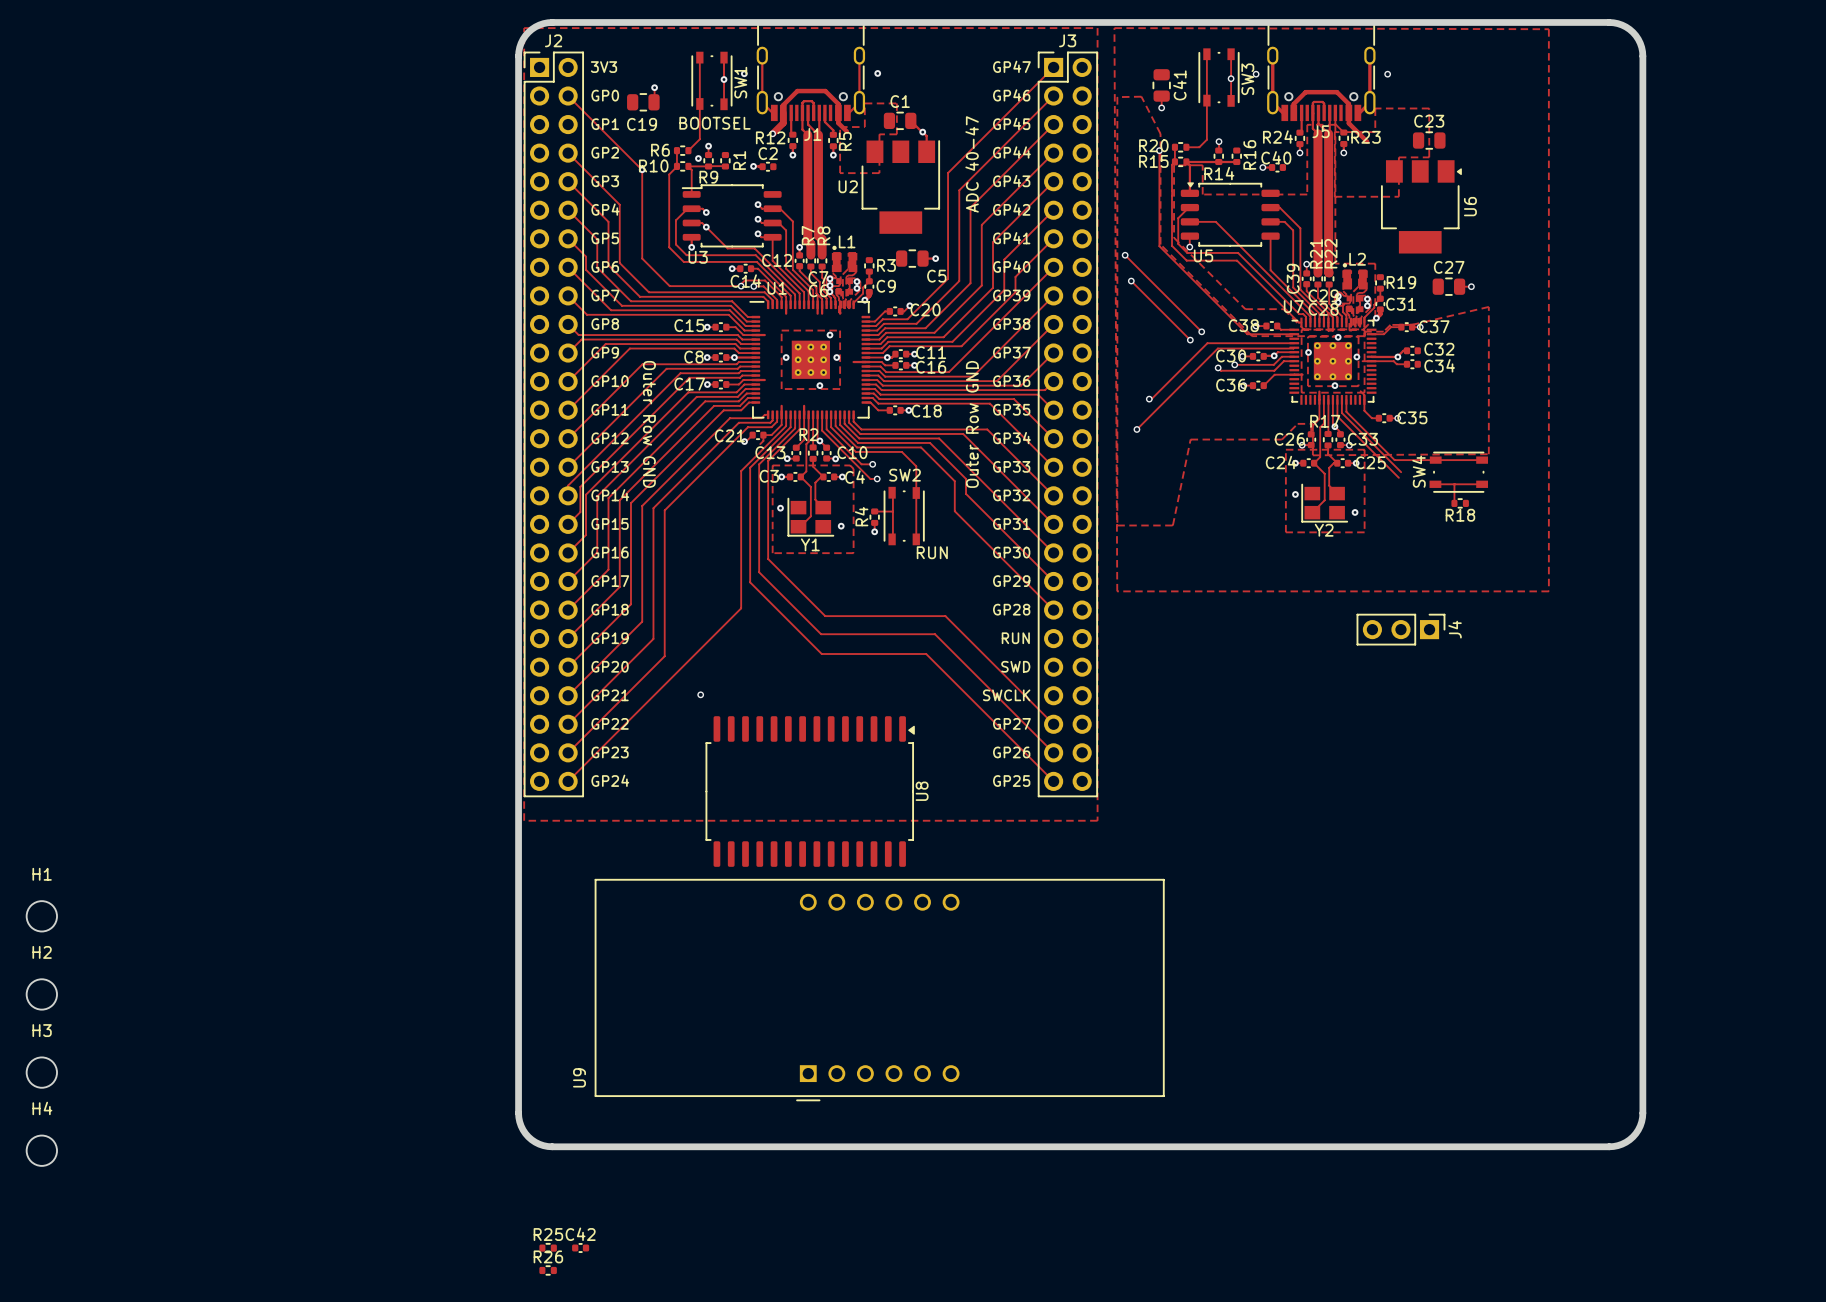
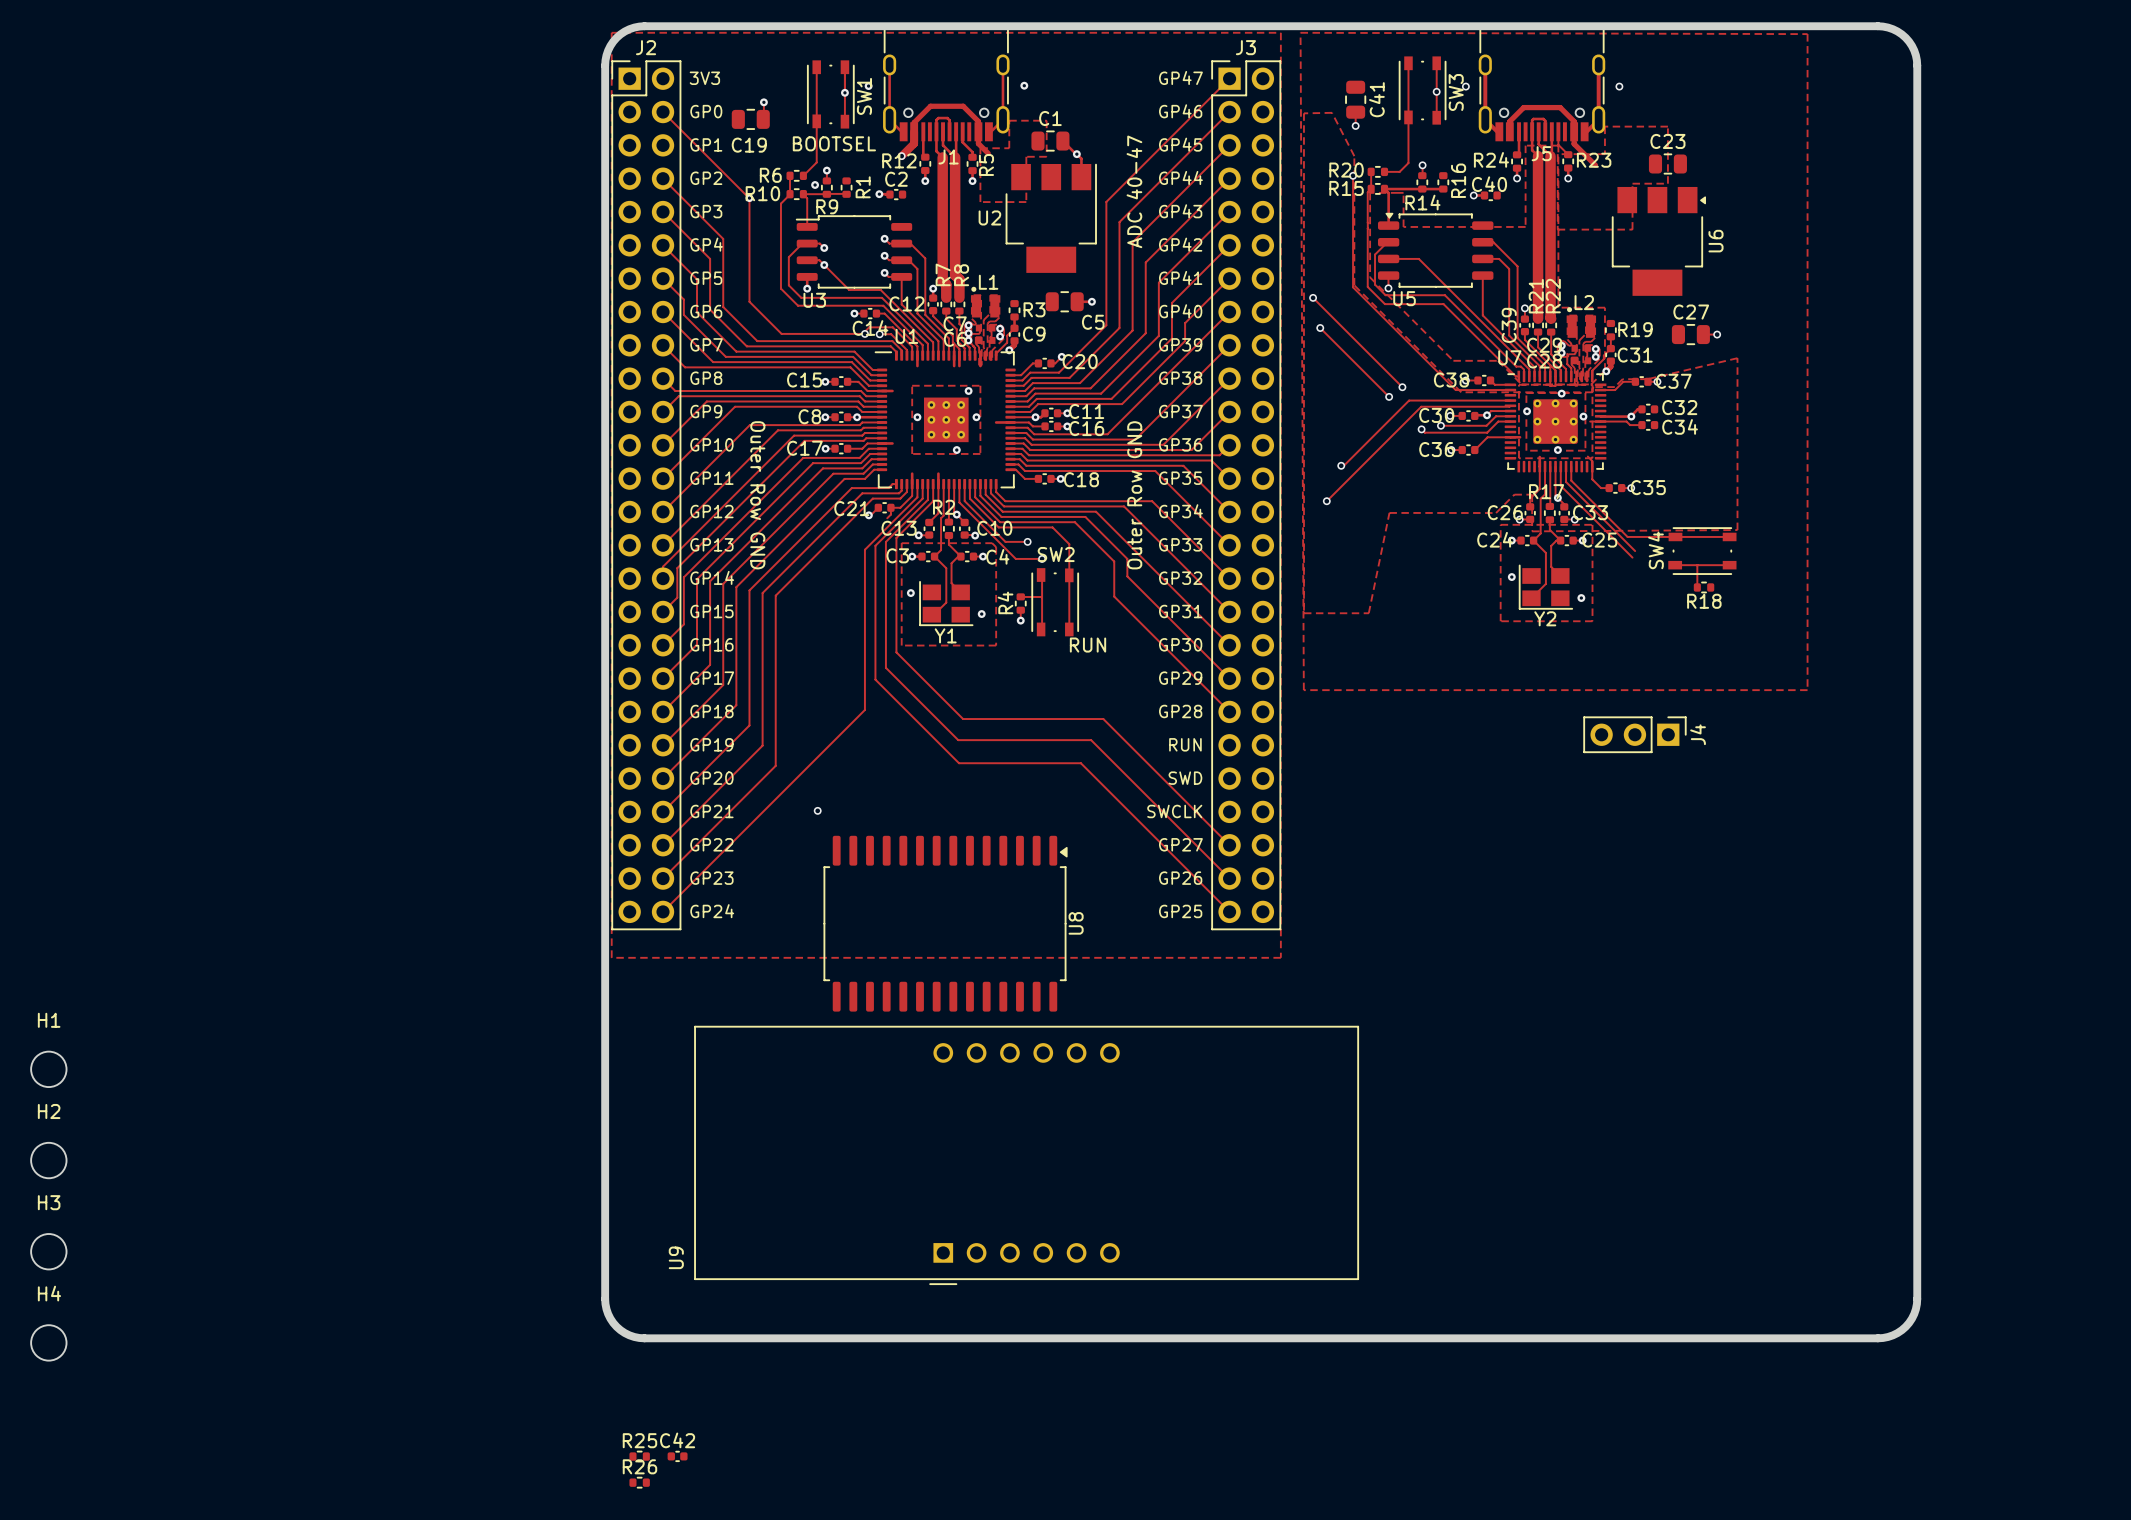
track: none -> (1018, 541) (1027, 541)
via: (872, 464) -> none
via: none -> (1027, 541)
track: none -> (1023, 558) (1042, 558)
via: (877, 478) -> none
via: none -> (1042, 558)

